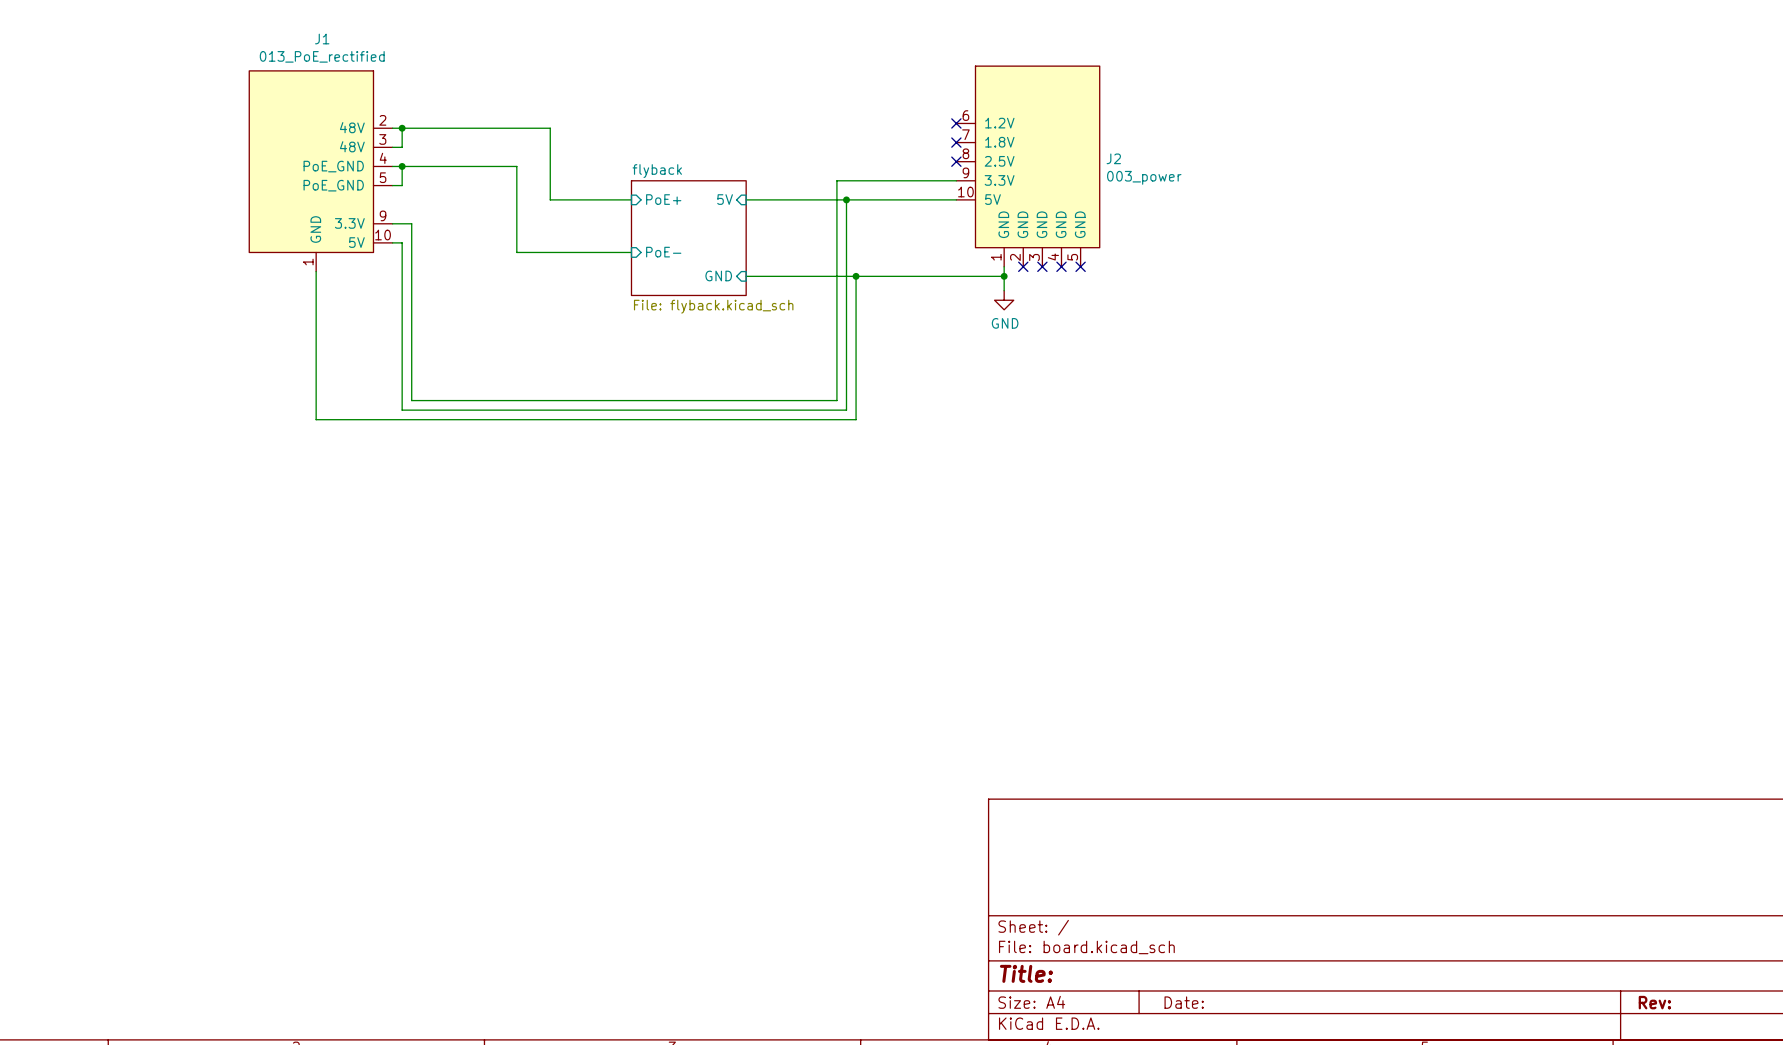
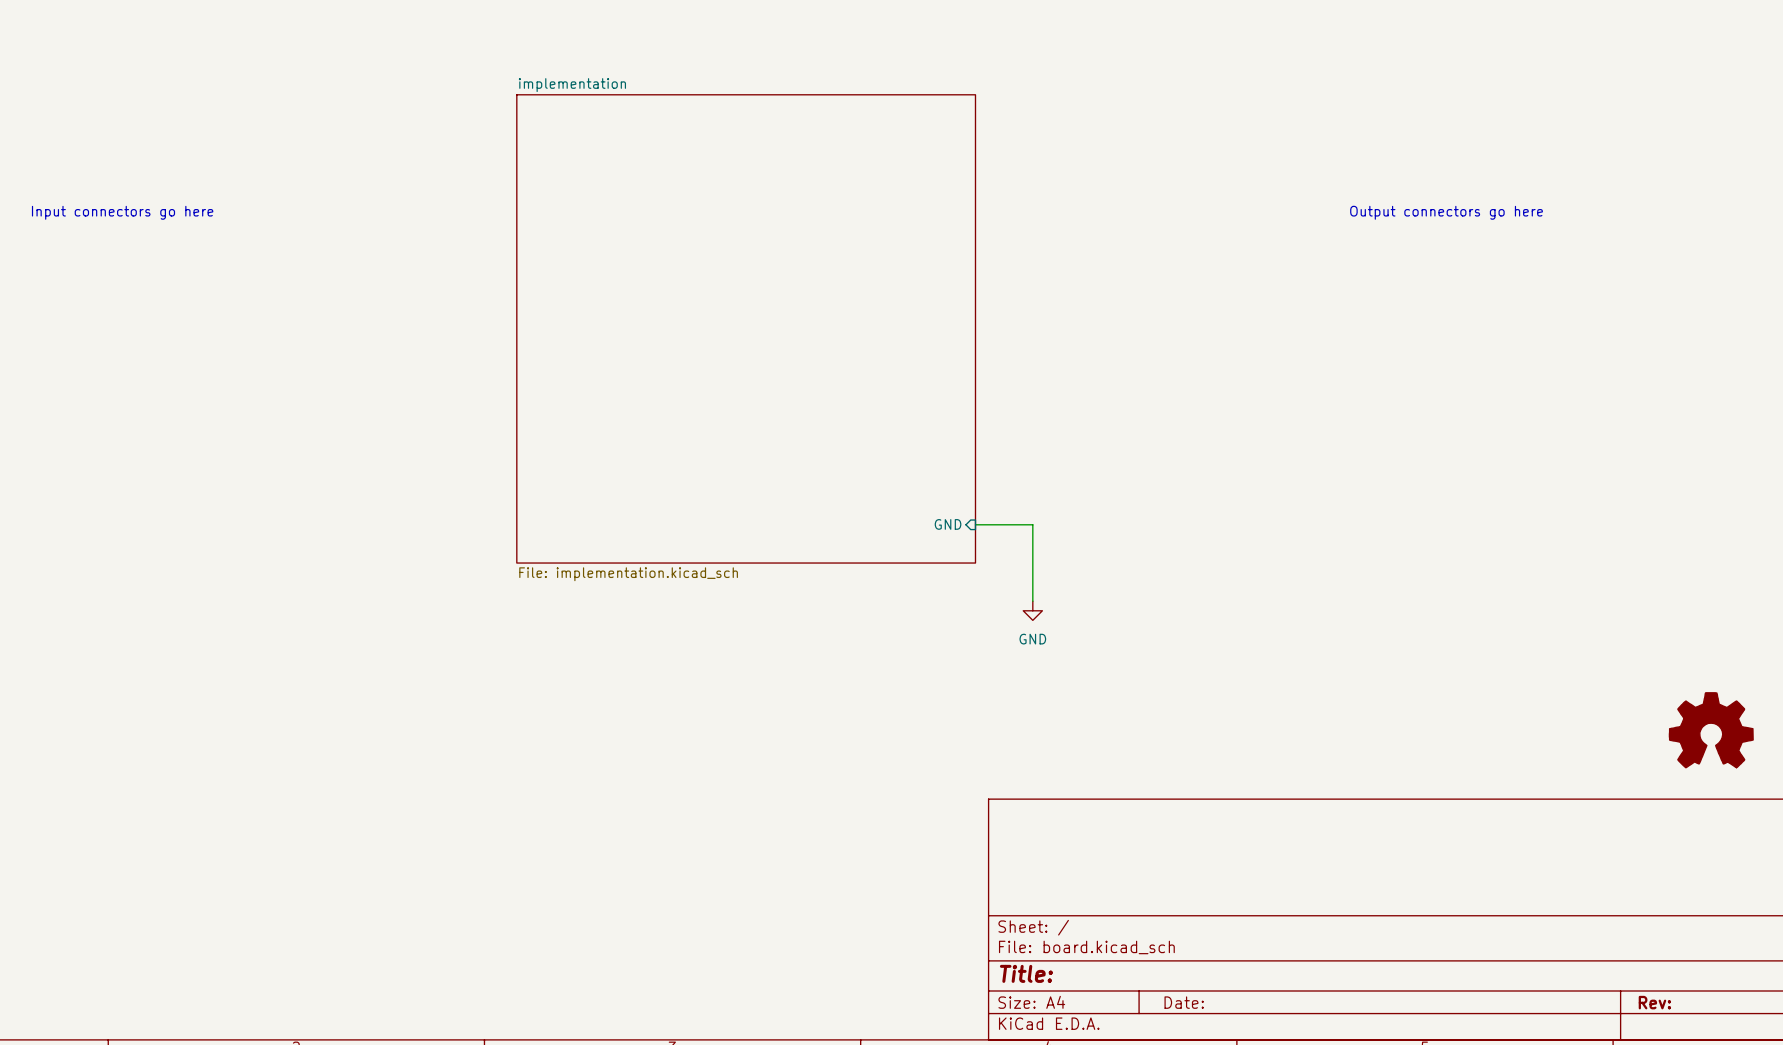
no-connect mark: (956, 123) -> none
wire: (392, 128) (550, 128) (550, 199) (631, 199) -> none
wire: (402, 128) (402, 147) (392, 147) -> none
junction: (402, 128) -> none
no-connect mark: (956, 142) -> none
no-connect mark: (956, 161) -> none
wire: (392, 166) (516, 166) (516, 252) (631, 252) -> none
wire: (402, 166) (402, 185) (392, 185) -> none
junction: (402, 166) -> none
J2: 003_power (1028, 166) -> none
J1: 013_PoE_rectified (320, 171) -> none
wire: (956, 180) (836, 180) (836, 400) (411, 400) (411, 223) (392, 223) -> none
sheet pin: PoE+ (663, 199) -> none
sheet pin: 5V (725, 199) -> none
wire: (746, 199) (956, 199) -> none
wire: (846, 199) (846, 410) (402, 410) (402, 242) (392, 242) -> none
junction: (846, 199) -> none
text: none -> Input connectors go here (122, 212)
text: none -> Output connectors go here (1446, 212)
sheet flyback: File: flyback.kicad_sch (688, 238) -> none
sheet pin: PoE- (663, 252) -> none
wire: (1004, 266) (1004, 290) -> none
no-connect mark: (1023, 266) -> none
no-connect mark: (1042, 266) -> none
no-connect mark: (1061, 266) -> none
no-connect mark: (1080, 266) -> none
wire: (316, 271) (316, 419) (856, 419) (856, 276) -> none
sheet pin: GND (718, 275) -> none
wire: (746, 276) (1004, 276) -> none
junction: (856, 276) -> none
junction: (1004, 276) -> none
power symbol: GND (1004, 300) -> none
sheet implementation: none -> File: implementation.kicad_sch (746, 328)
sheet pin: none -> GND (948, 524)
wire: none -> (975, 524) (1032, 524) (1032, 601)
power symbol: none -> GND (1032, 610)
part: none -> (1711, 730)

